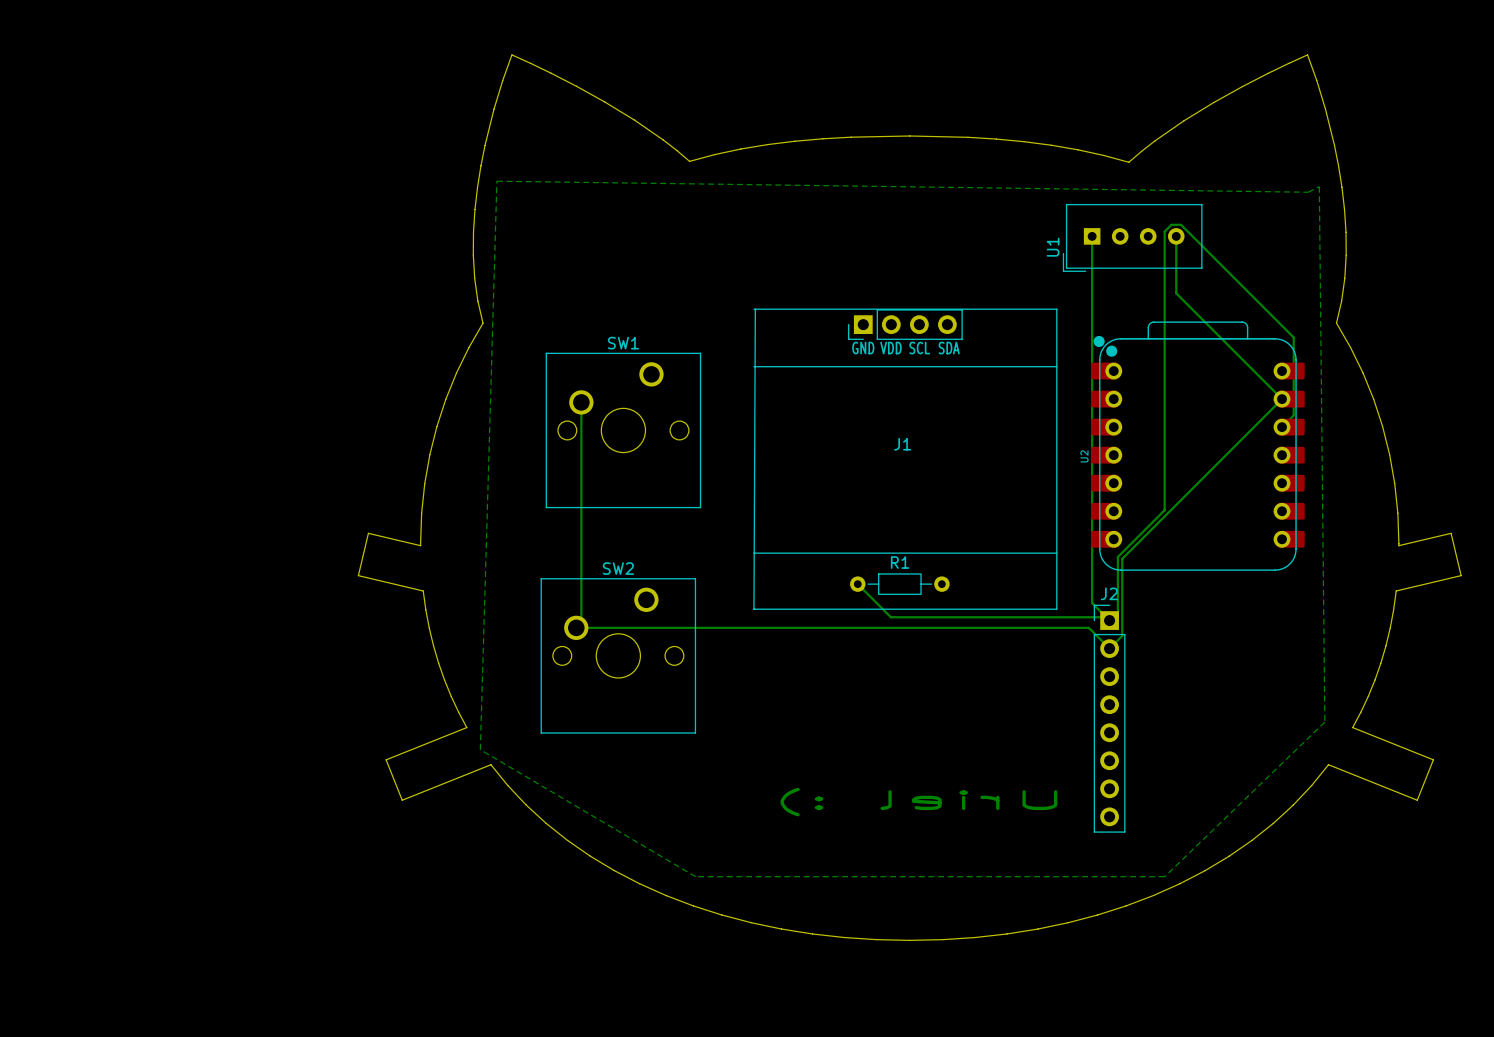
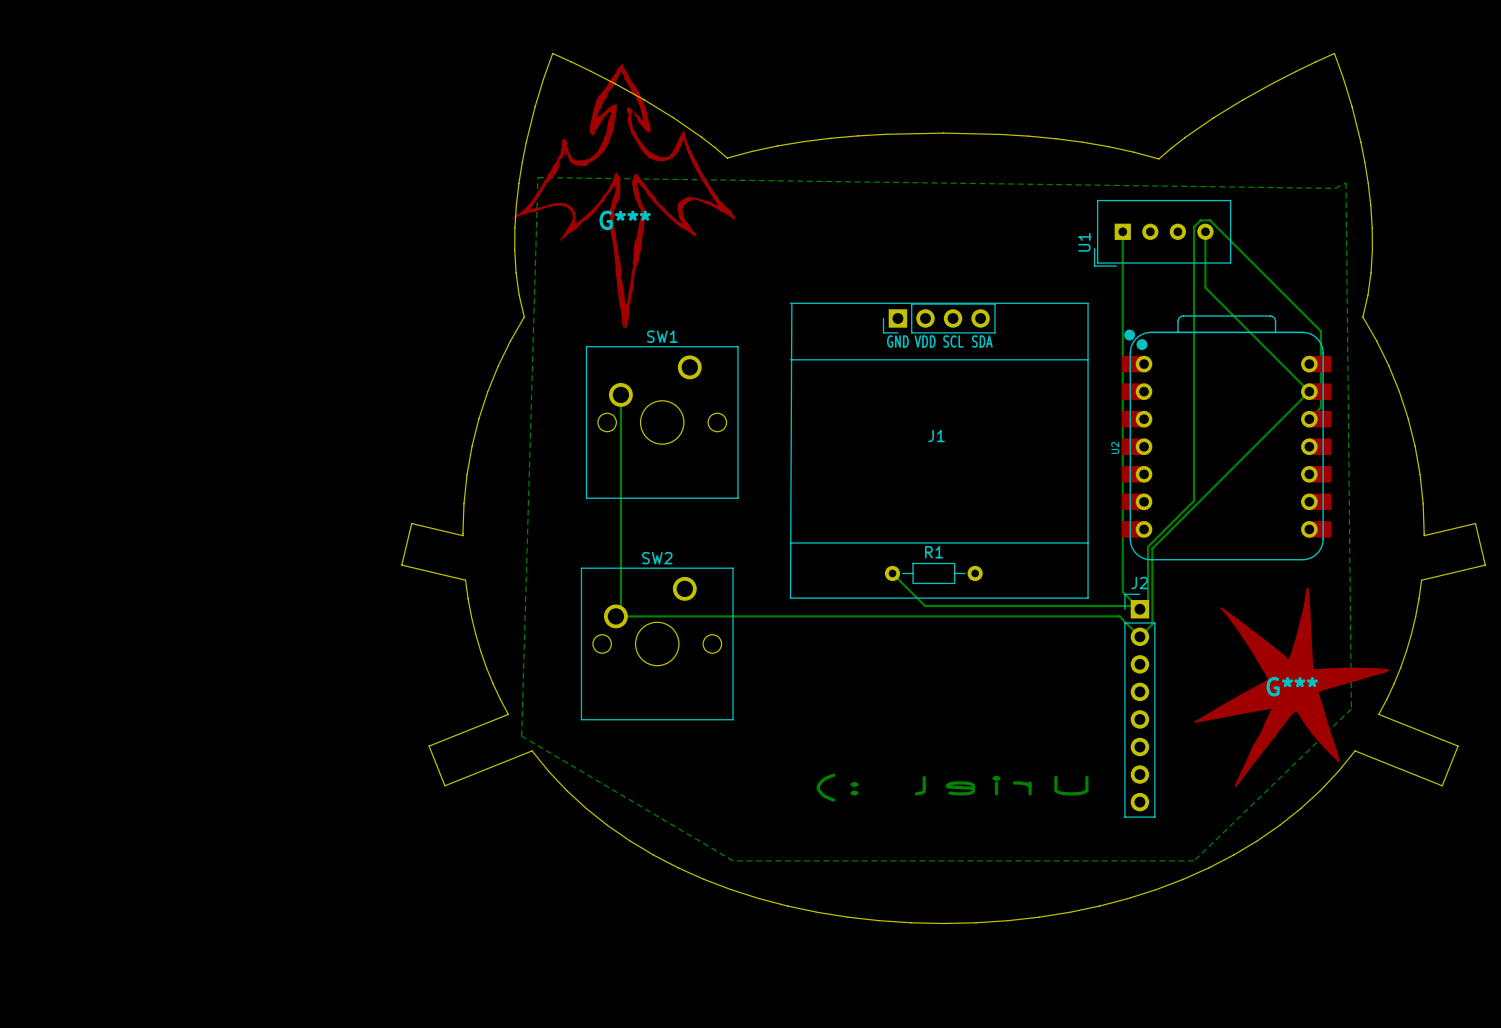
G***: none -> (623, 197)
G***: none -> (1291, 687)

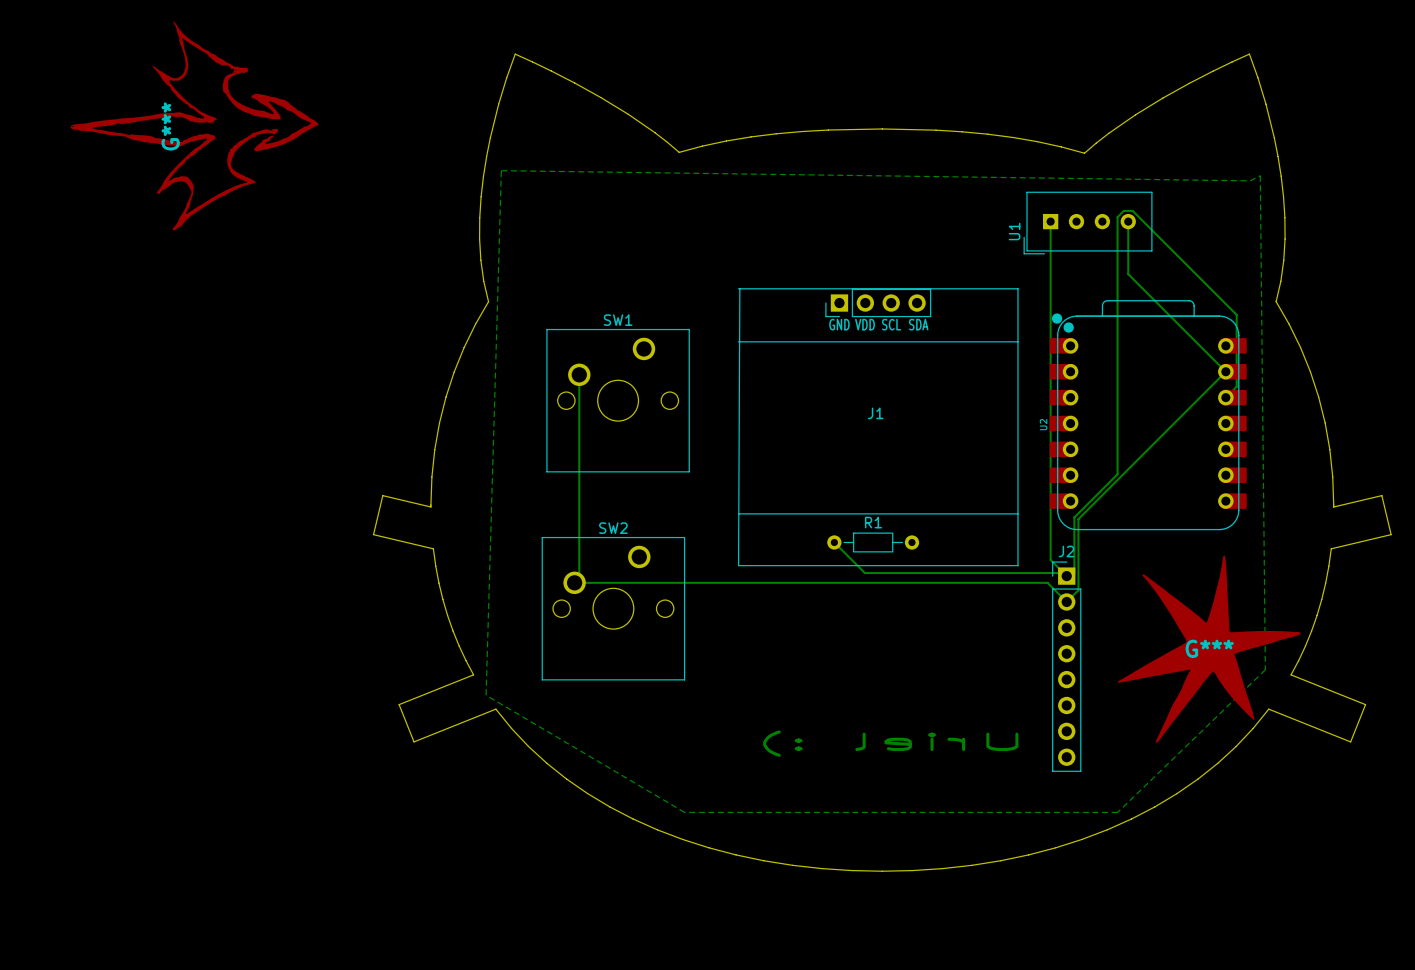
G***: none -> (193, 125)
G***: (623, 197) -> none

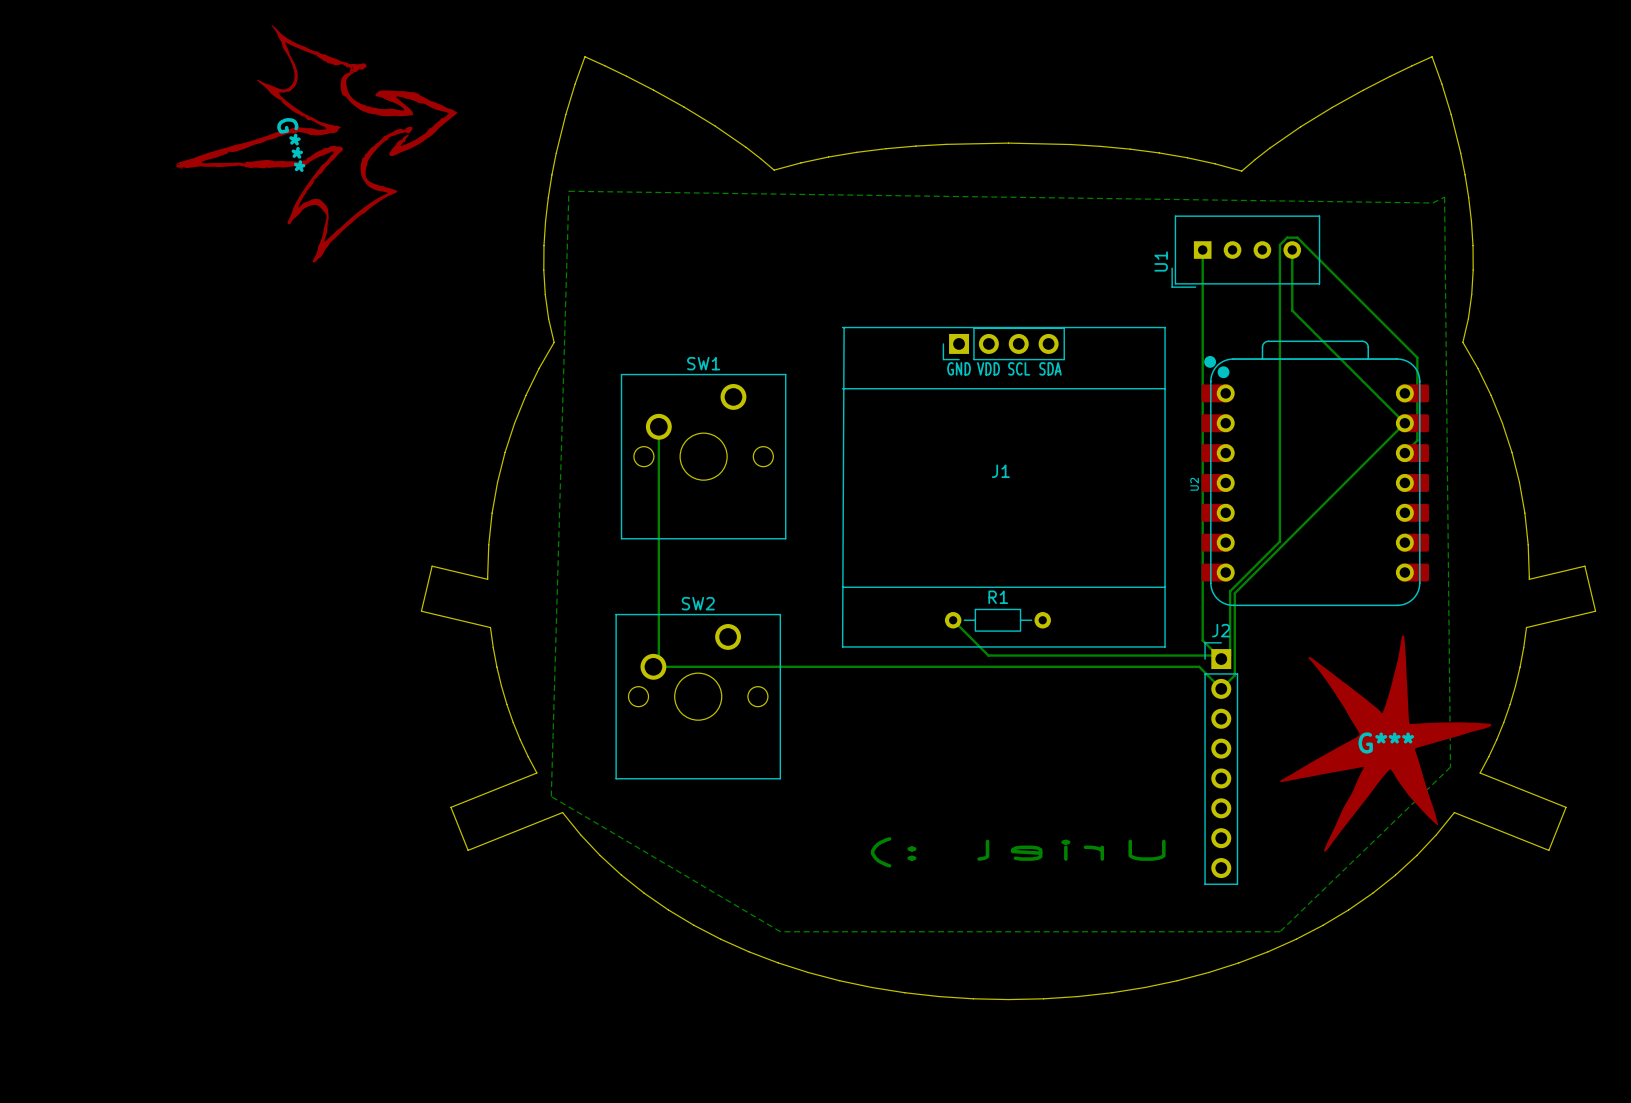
G***: (193, 125) -> none
G***: none -> (315, 143)

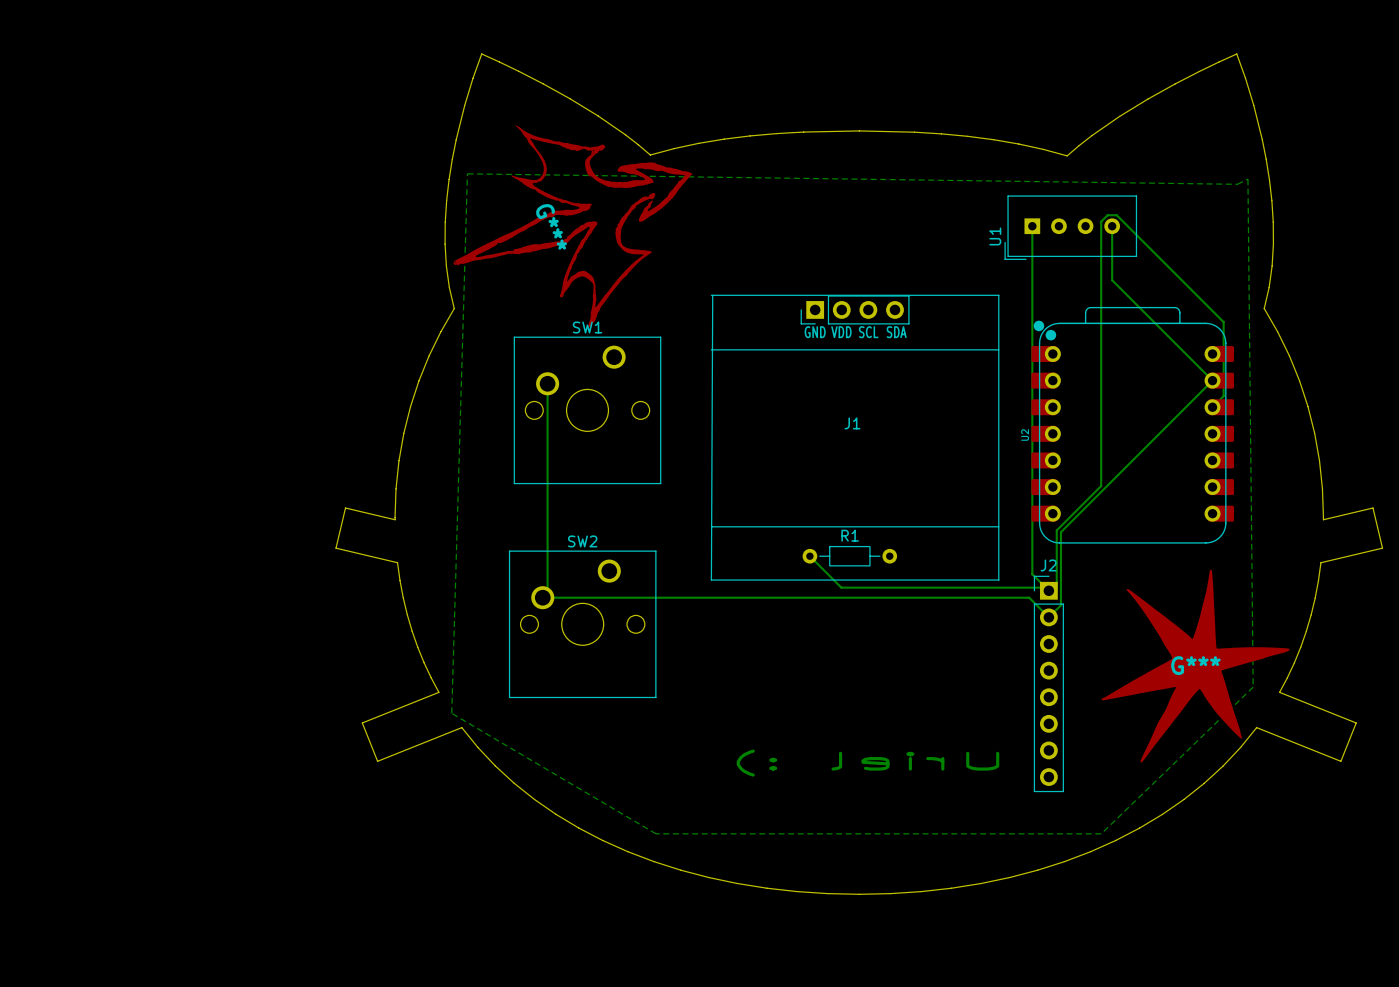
G***: (315, 143) -> none
G***: none -> (572, 226)

